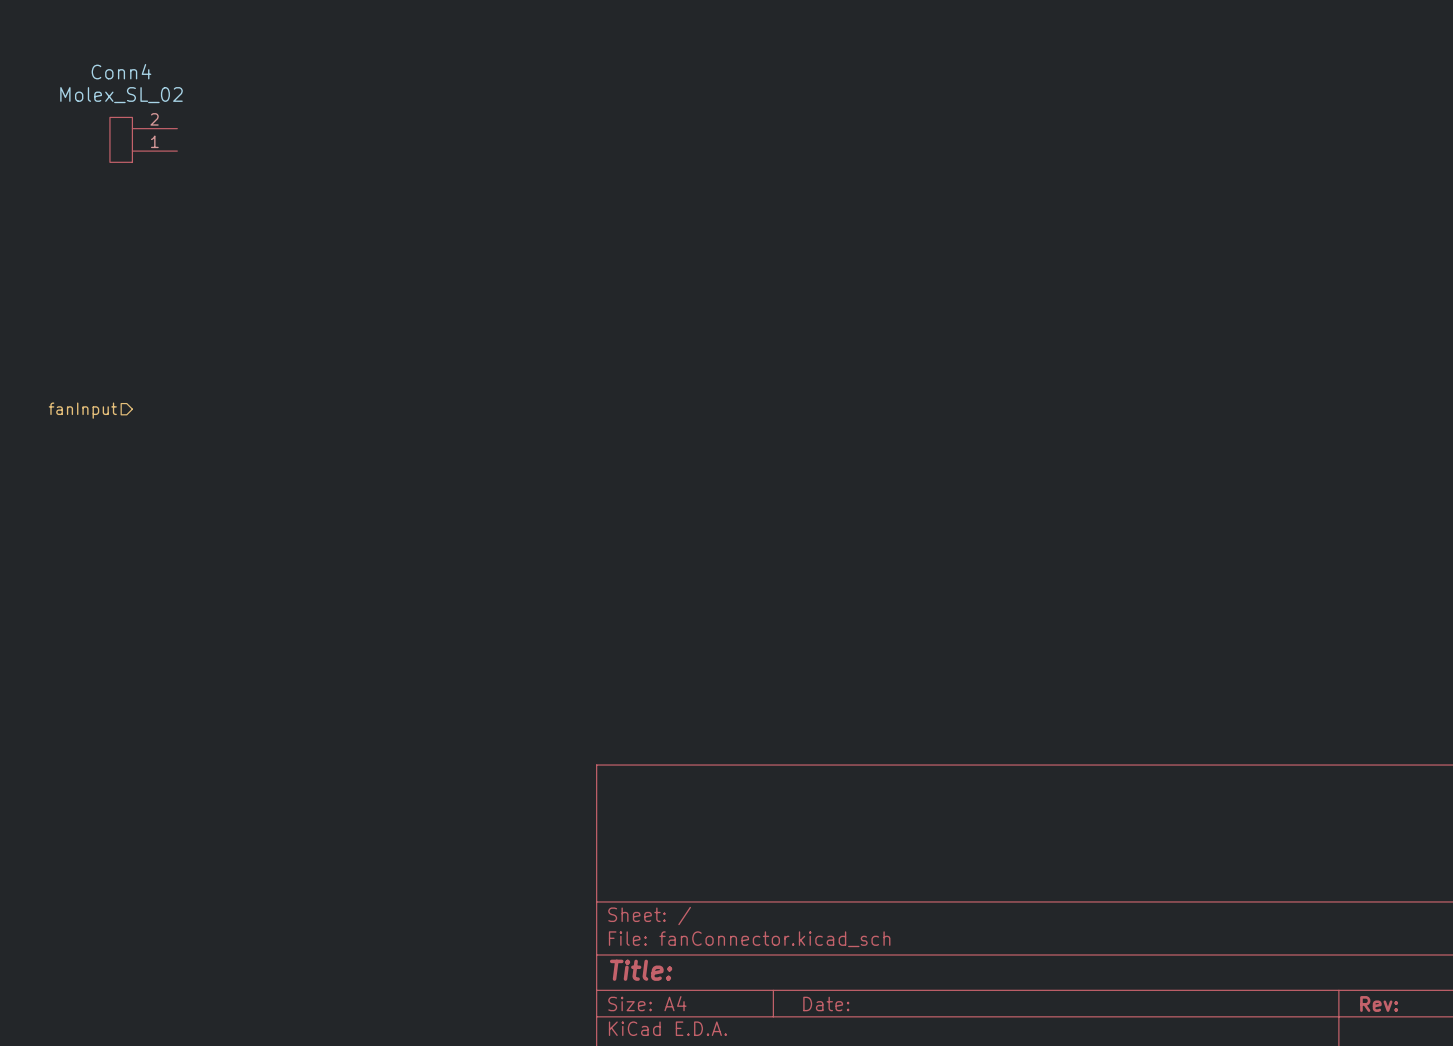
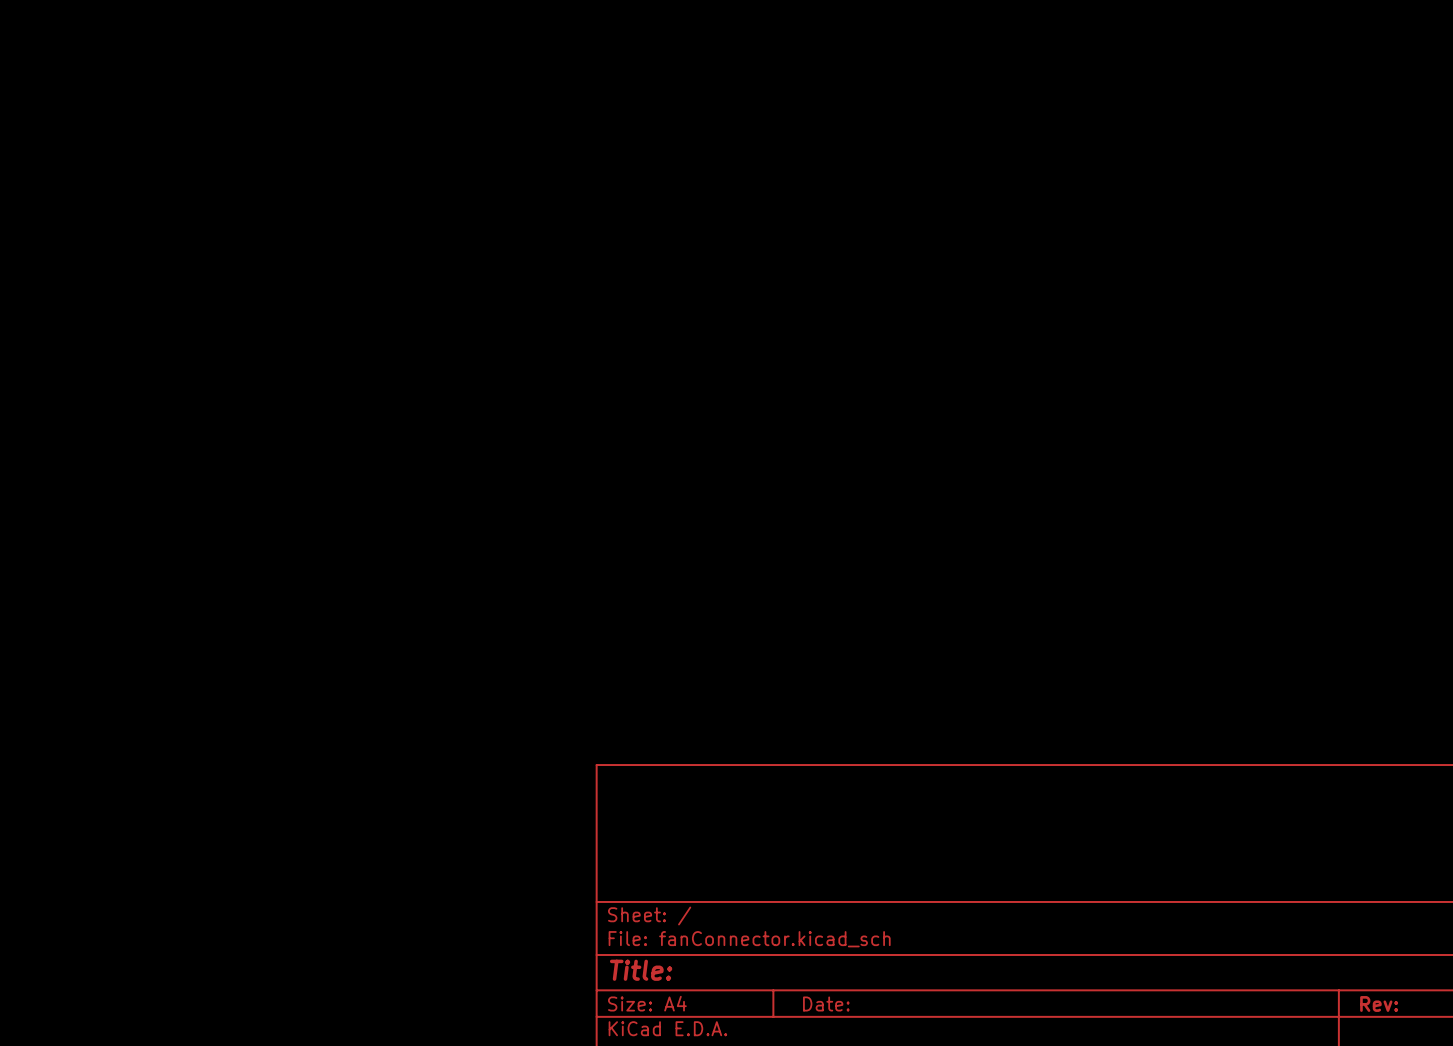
Conn4: Molex_SL_02 (143, 139) -> none
hierarchical label: fanInput (82, 410) -> none

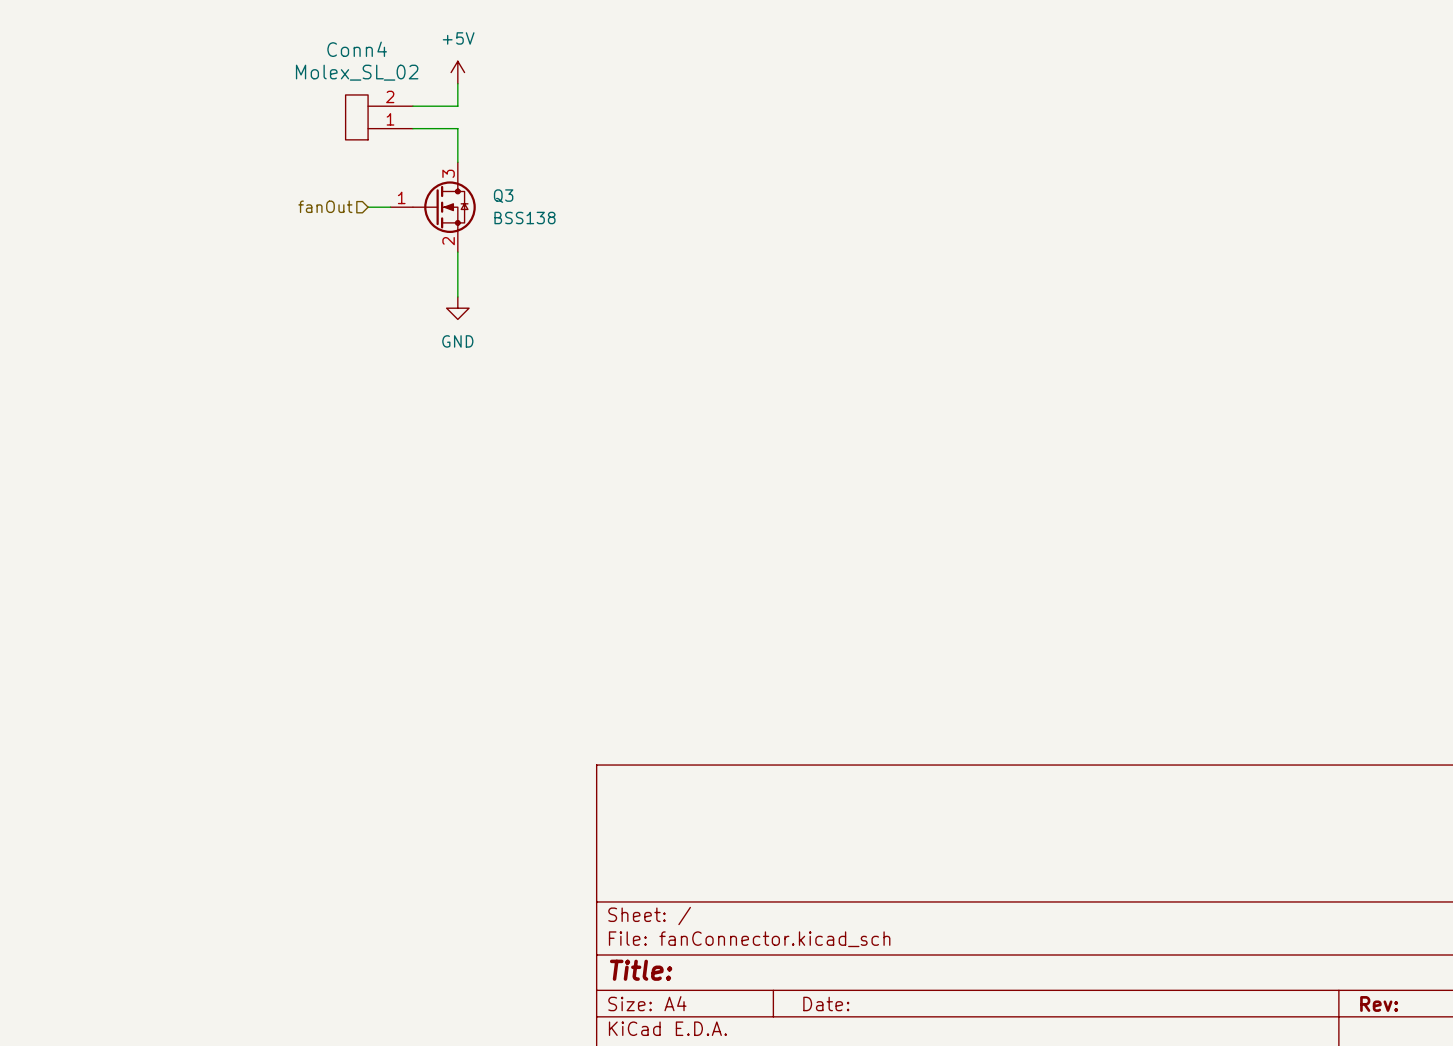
power symbol: none -> +5V (457, 72)
wire: none -> (457, 83) (457, 106) (412, 106)
Conn4: none -> Molex_SL_02 (379, 117)
wire: none -> (412, 128) (457, 128) (457, 162)
hierarchical label: none -> fanOut (325, 206)
wire: none -> (368, 207) (390, 207)
Q3: none -> BSS138 (433, 207)
wire: none -> (457, 252) (457, 296)
power symbol: none -> GND (457, 308)

